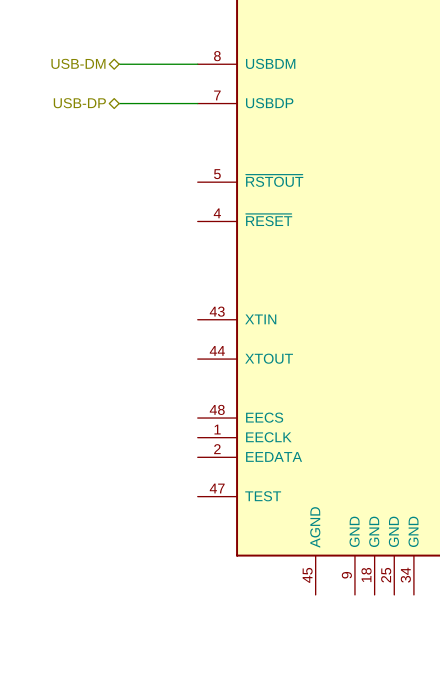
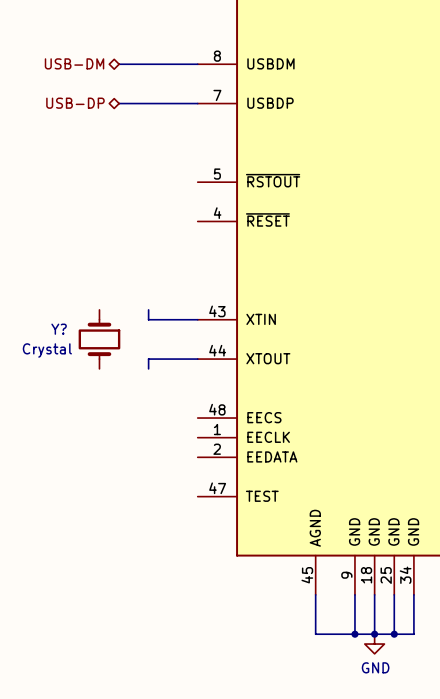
wire: none -> (148, 309) (148, 319) (197, 319)
Y?: none -> Crystal (99, 339)
wire: none -> (197, 359) (148, 359) (148, 368)
wire: none -> (315, 594) (315, 634) (413, 634) (413, 594)
wire: none -> (354, 594) (354, 634)
wire: none -> (374, 594) (374, 634)
wire: none -> (394, 594) (394, 634)
junction: none -> (354, 634)
junction: none -> (374, 634)
junction: none -> (394, 634)
power symbol: none -> GND (374, 644)

